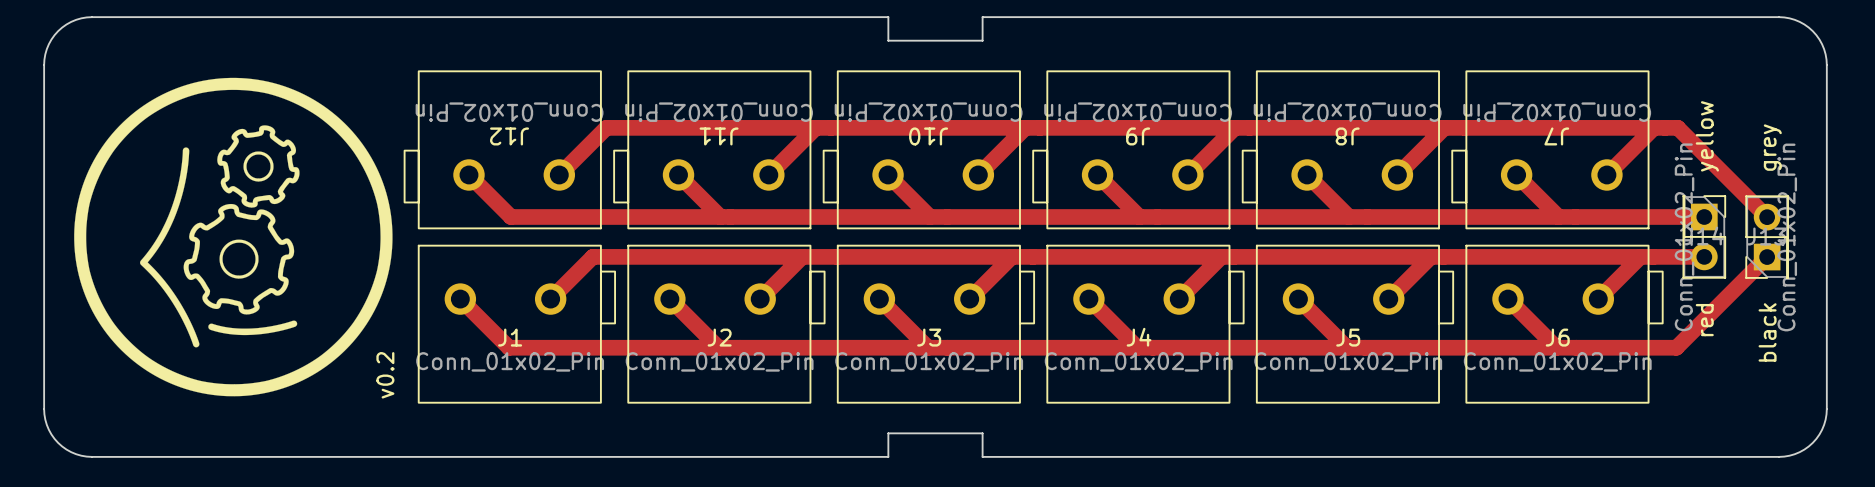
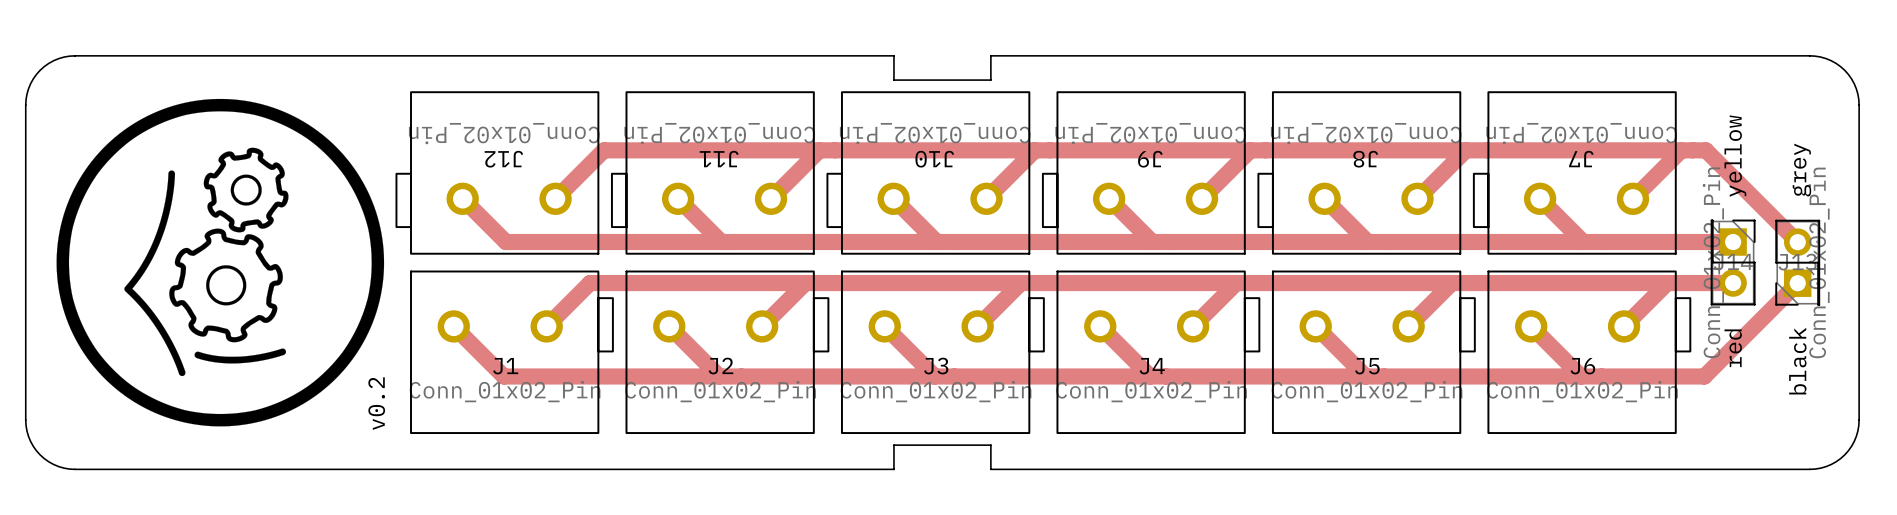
board edge: (888, 35) (888, 17) (86, 17) (66, 24) (51, 39) (44, 59) (44, 83) -> (893, 55) (69, 56) (53, 60) (40, 70) (30, 83) (25, 105)
board edge: (982, 35) (982, 17) (1784, 17) (1804, 24) (1819, 39) (1826, 59) (1826, 83) -> (990, 55) (1815, 56) (1831, 60) (1844, 70) (1854, 83) (1859, 105)
board edge: (888, 40) (982, 40) -> (893, 60) (893, 80) (990, 80) (990, 60)
board edge: (44, 390) (44, 414) (51, 434) (66, 449) (86, 456) (888, 456) (888, 438) -> (25, 420) (28, 436) (36, 450) (53, 464) (69, 469) (893, 469)
board edge: (1826, 390) (1826, 414) (1819, 434) (1804, 449) (1784, 456) (982, 456) (982, 438) -> (1859, 420) (1854, 441) (1844, 454) (1831, 464) (1815, 469) (990, 469)
board edge: (888, 433) (982, 433) -> (893, 464) (893, 445) (990, 445) (990, 464)

